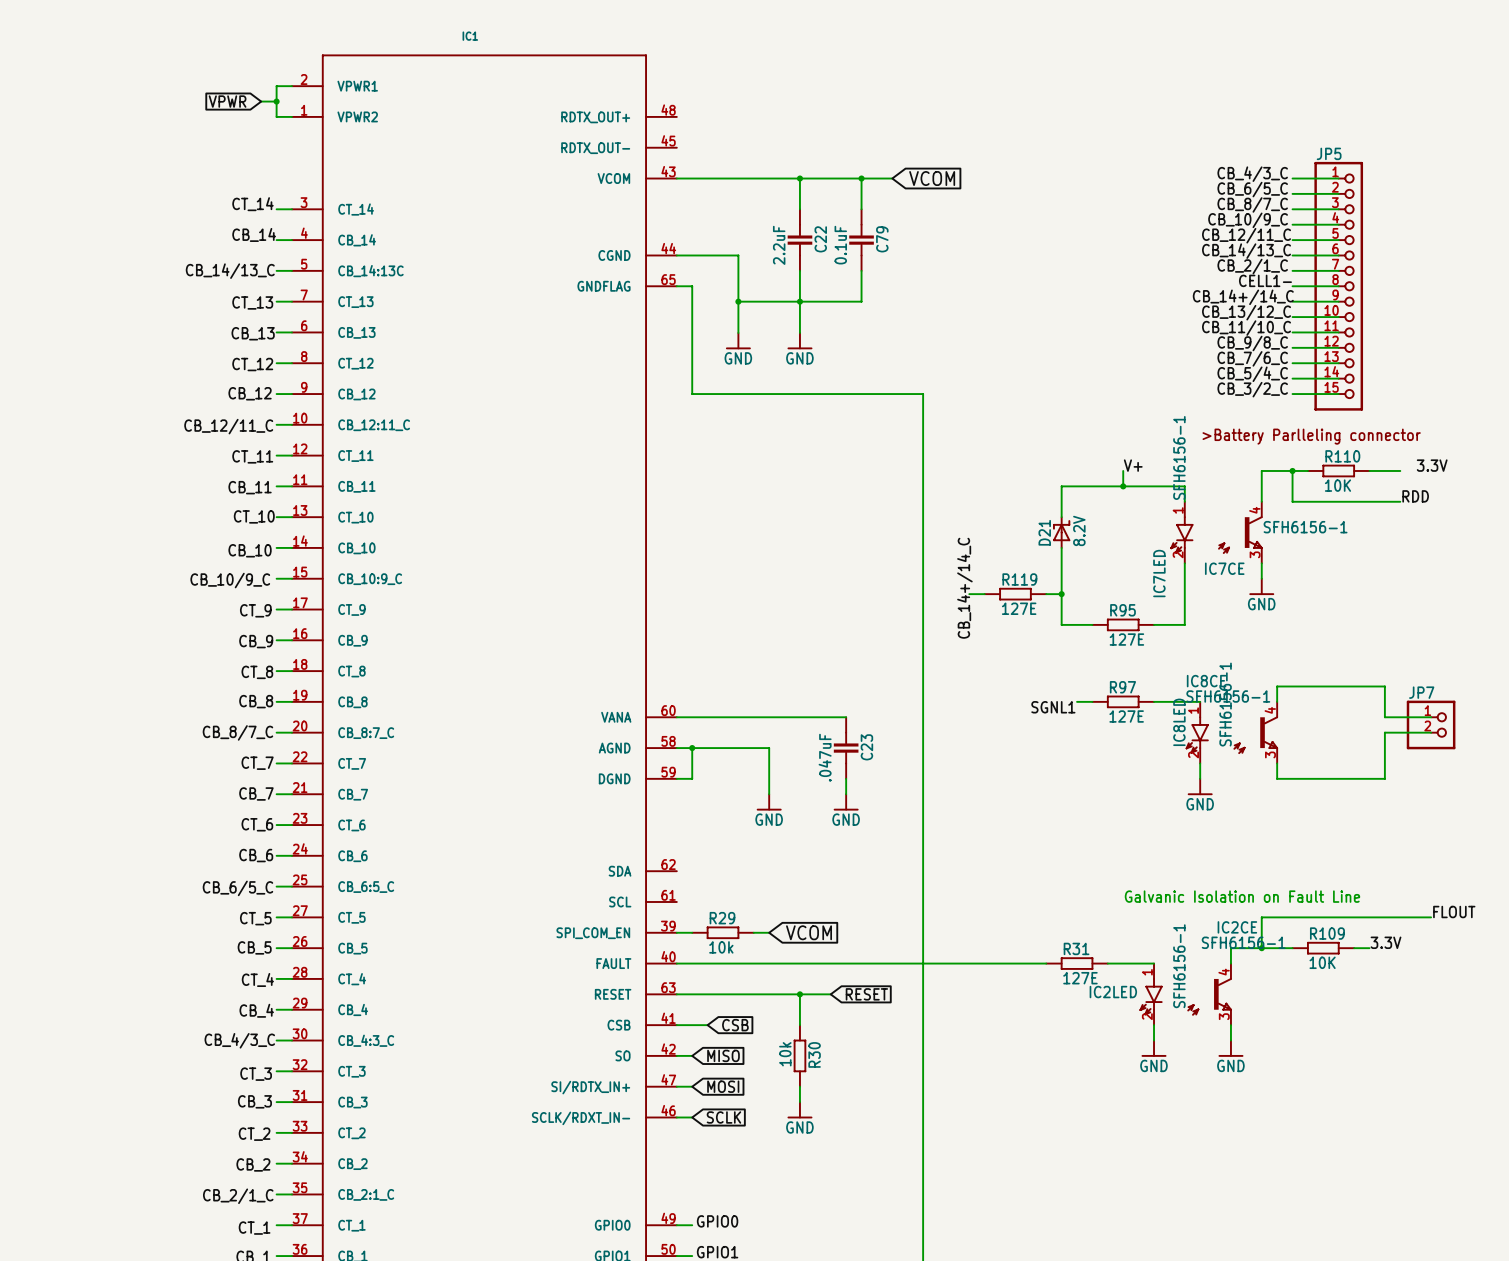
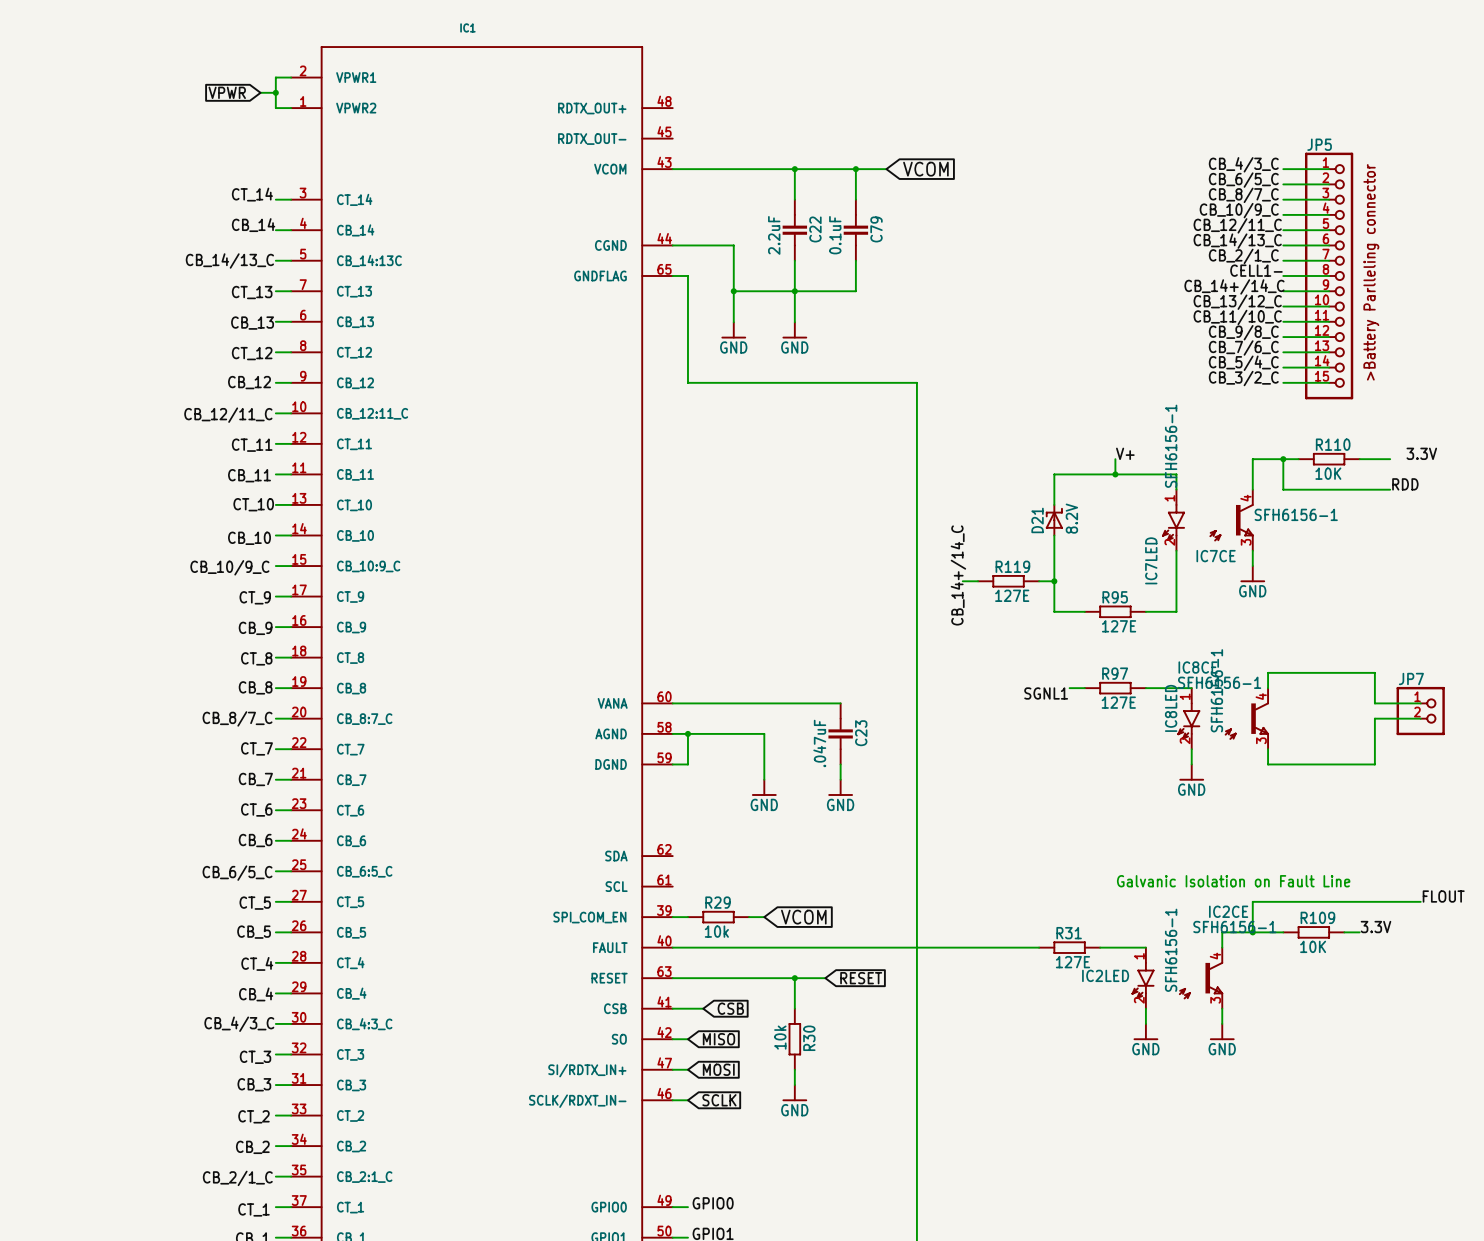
text: none -> >Battery Parlleling connector (1371, 272)
text: >Battery Parlleling connector (1311, 436) -> none

